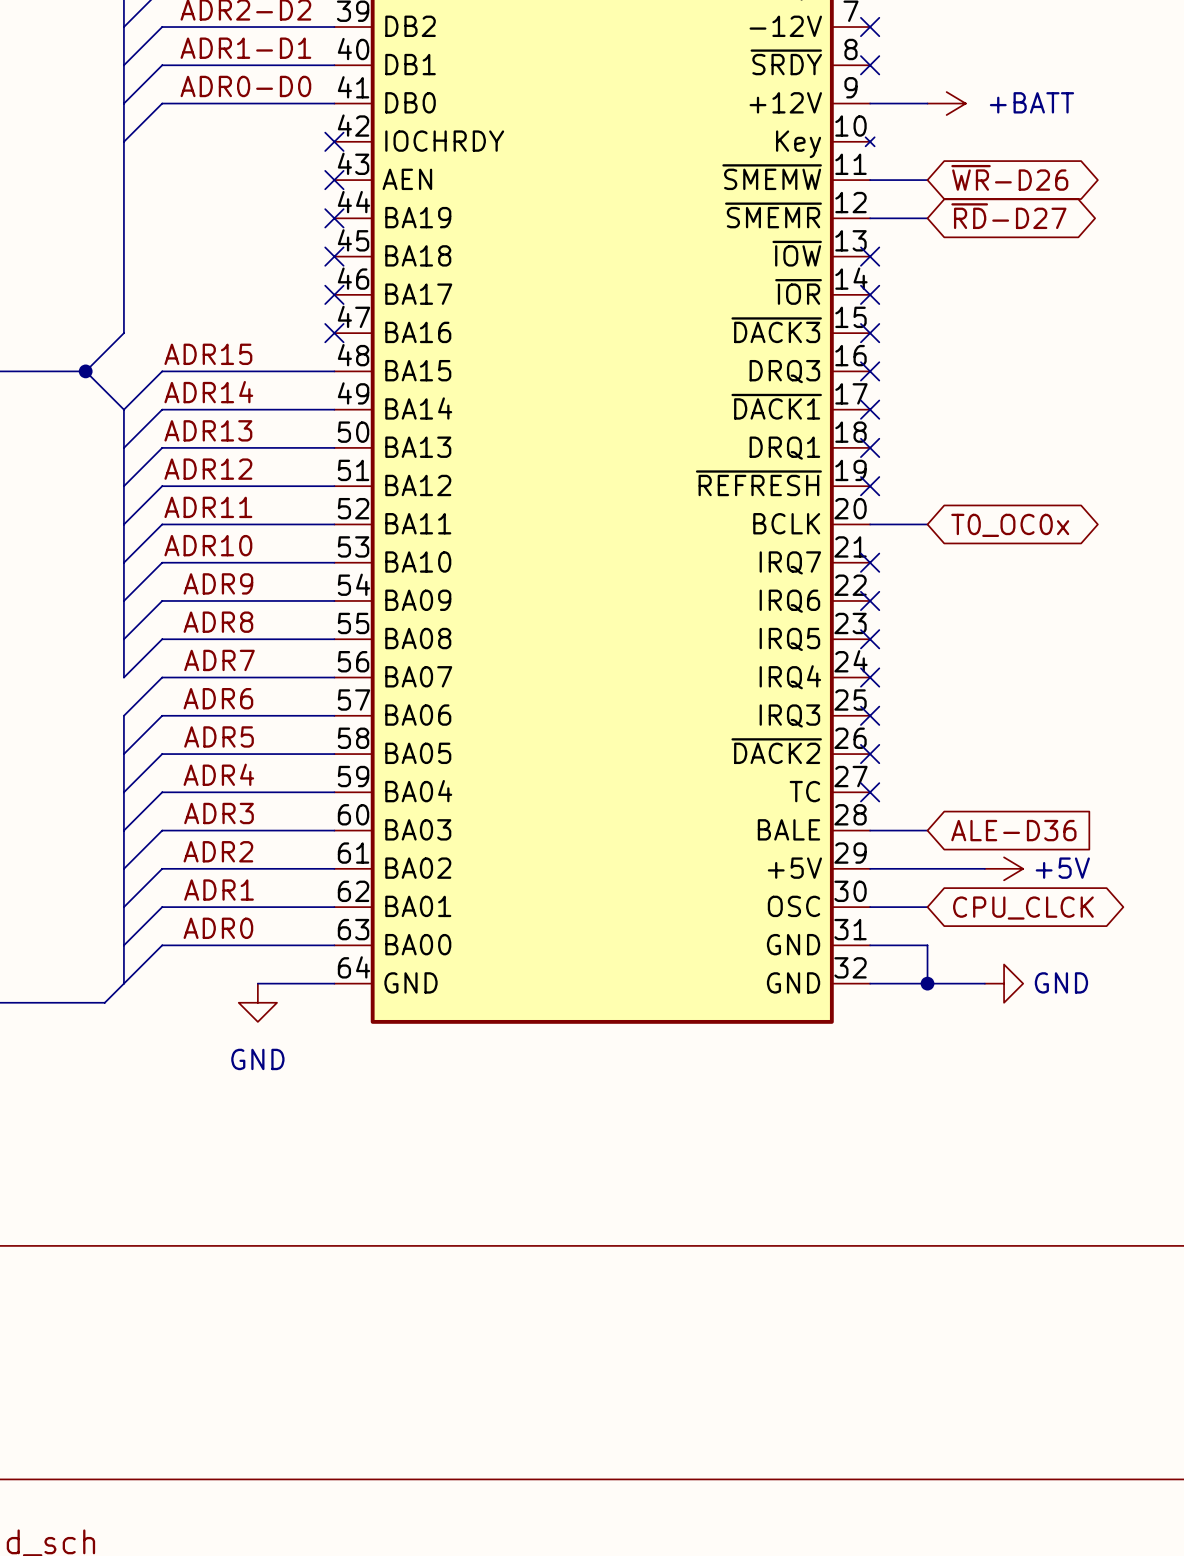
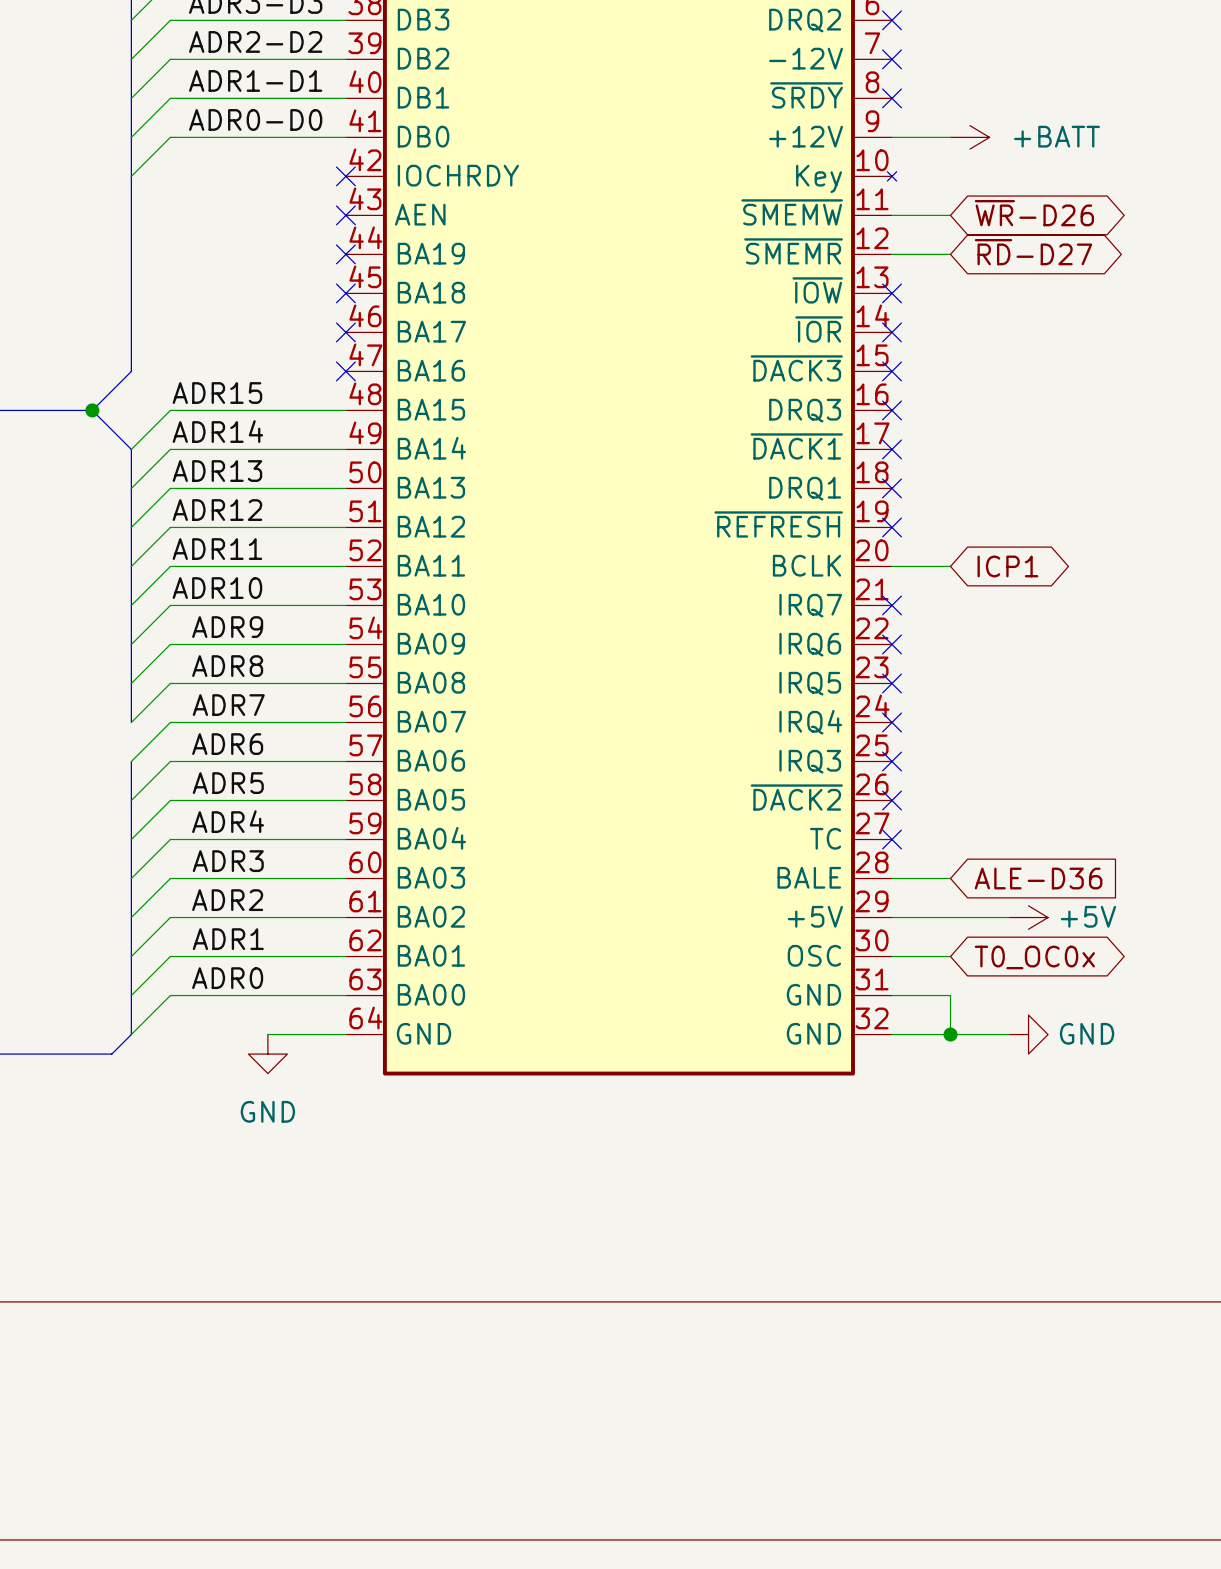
global label: T0_OC0x (1010, 525) -> ICP1 (1007, 566)
global label: CPU_CLCK (1023, 908) -> T0_OC0x (1034, 957)

